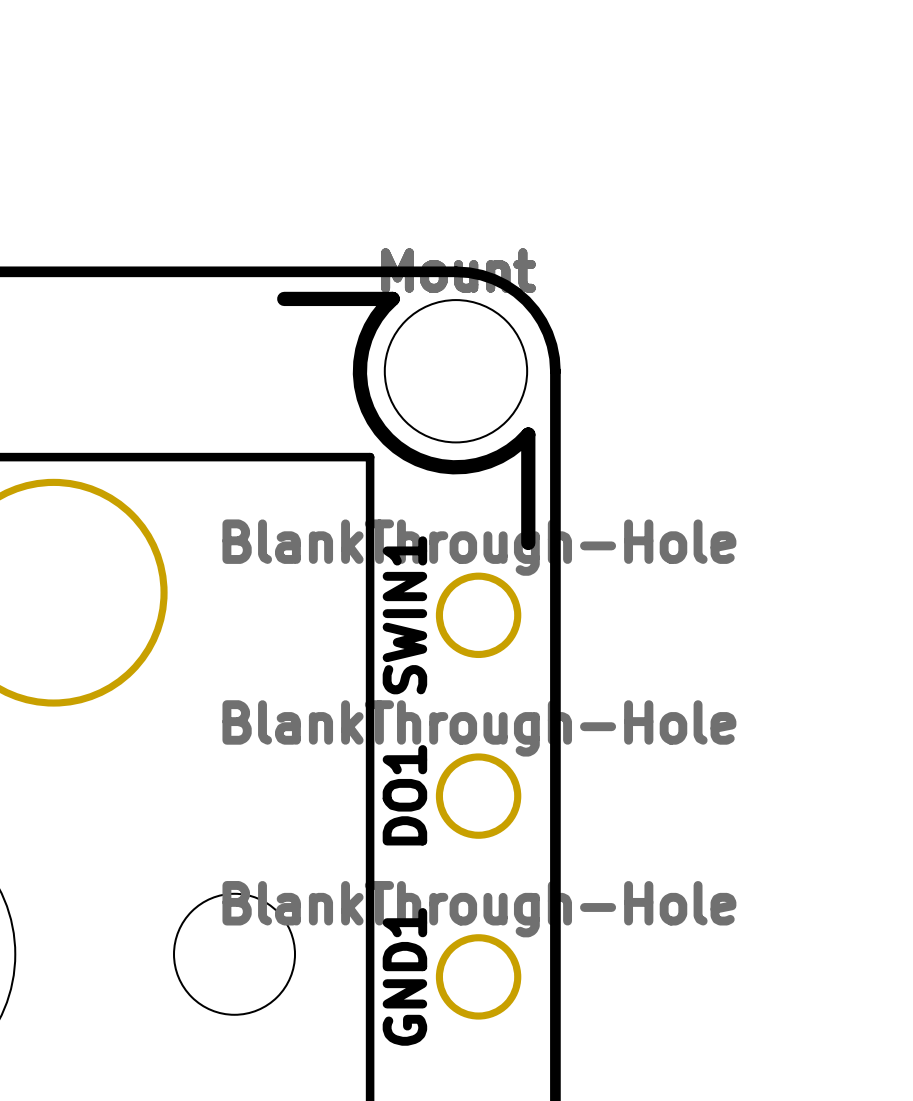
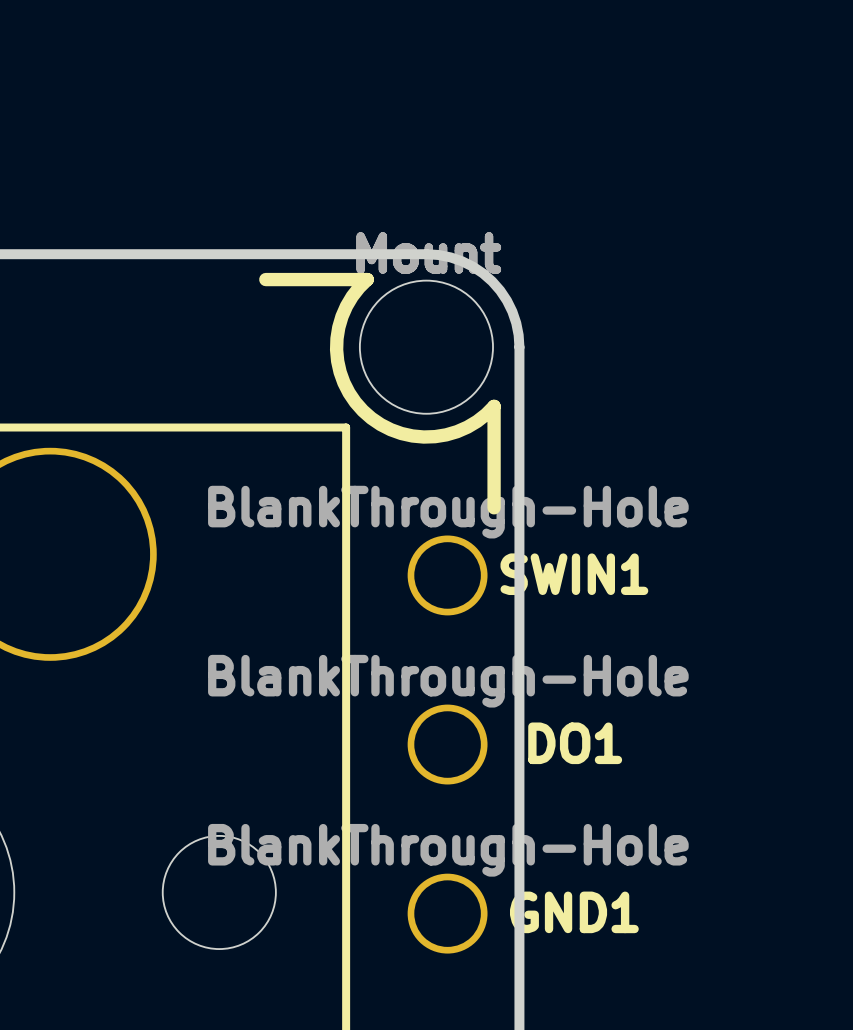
SWIN1 name rotation: 0° (404, 615) -> 90° clockwise (574, 574)
SWIN1 name position: SWIN1 (404, 615) -> SWIN1 (574, 574)
DO1 name rotation: 0° (404, 795) -> 90° clockwise (575, 743)
DO1 name position: DO1 (404, 795) -> DO1 (575, 743)
GND1 name rotation: 0° (404, 976) -> 90° clockwise (574, 912)
GND1 name position: GND1 (404, 976) -> GND1 (574, 912)

